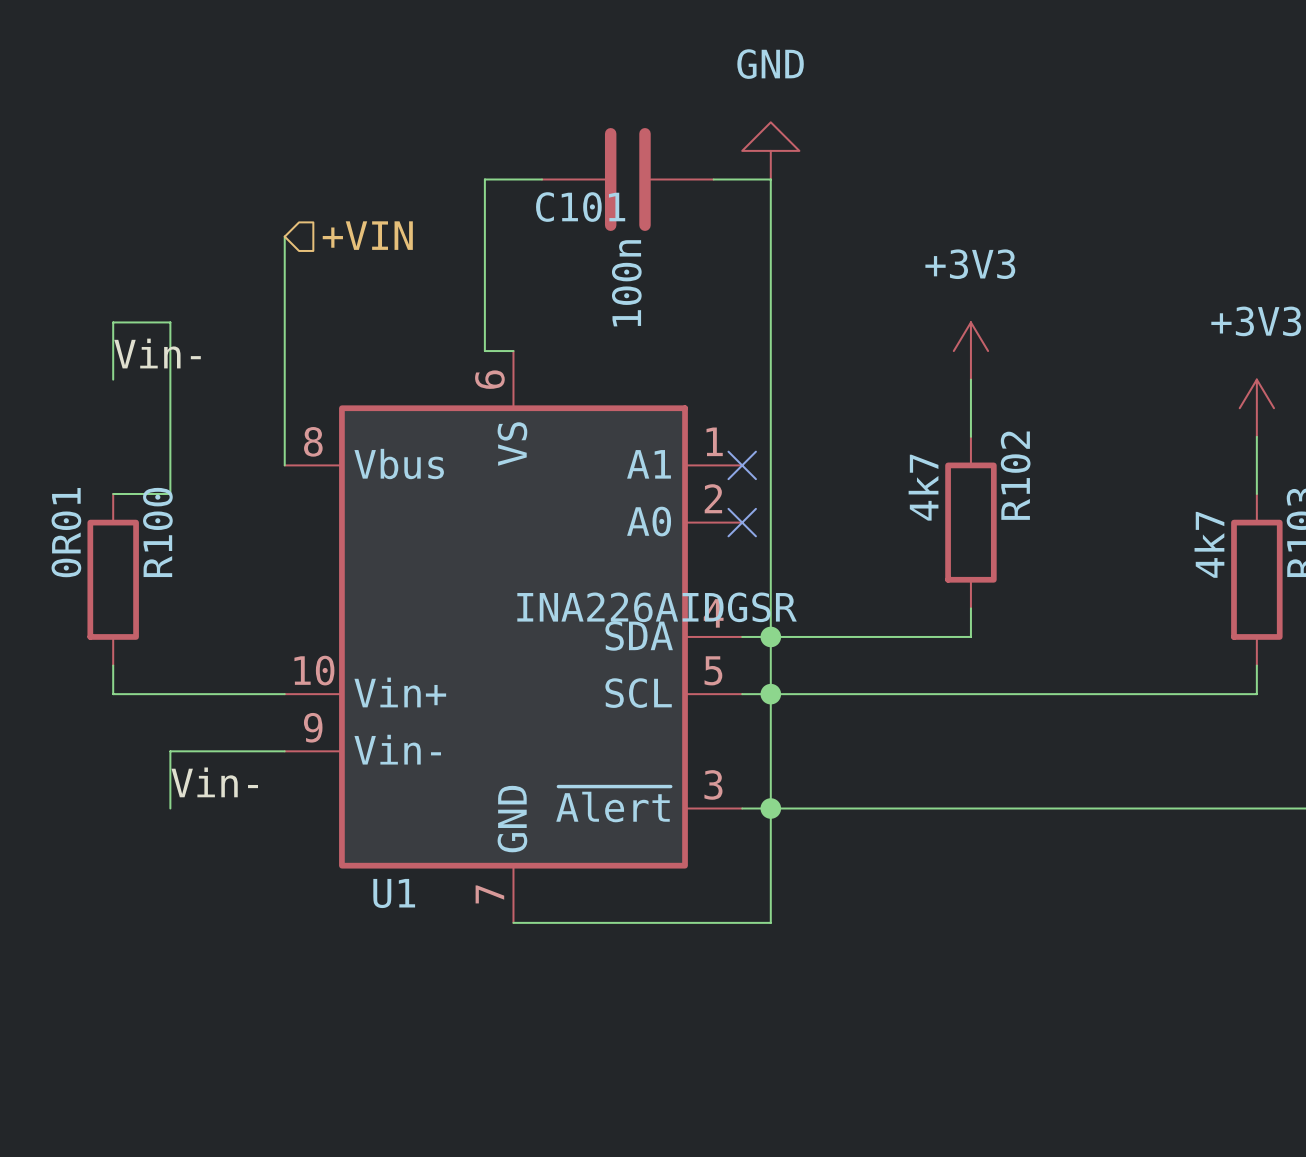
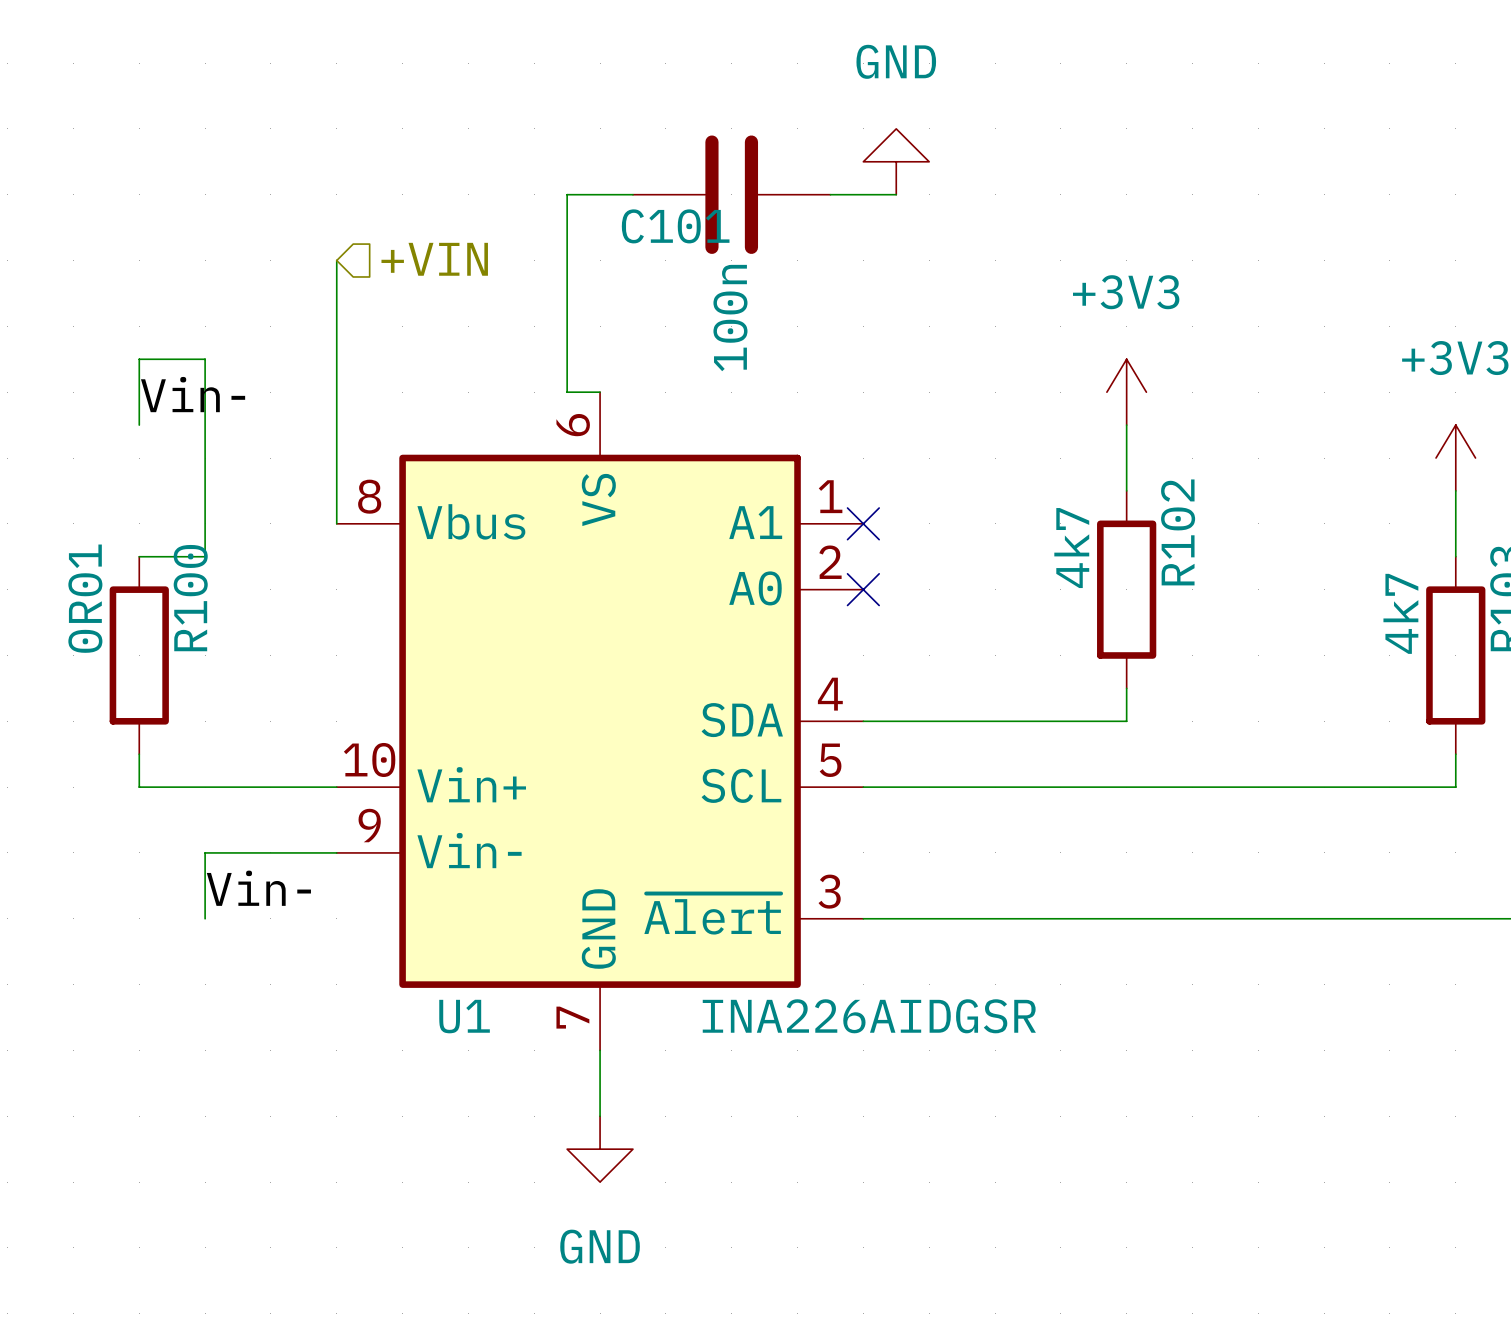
wire: (770, 179) (770, 922) (513, 922) -> (600, 1116) (600, 1050)
U1 value position: INA226AIDGSR (657, 607) -> INA226AIDGSR (869, 1016)
junction: (770, 636) -> none
junction: (770, 694) -> none
junction: (770, 808) -> none
power symbol: none -> GND (600, 1149)

